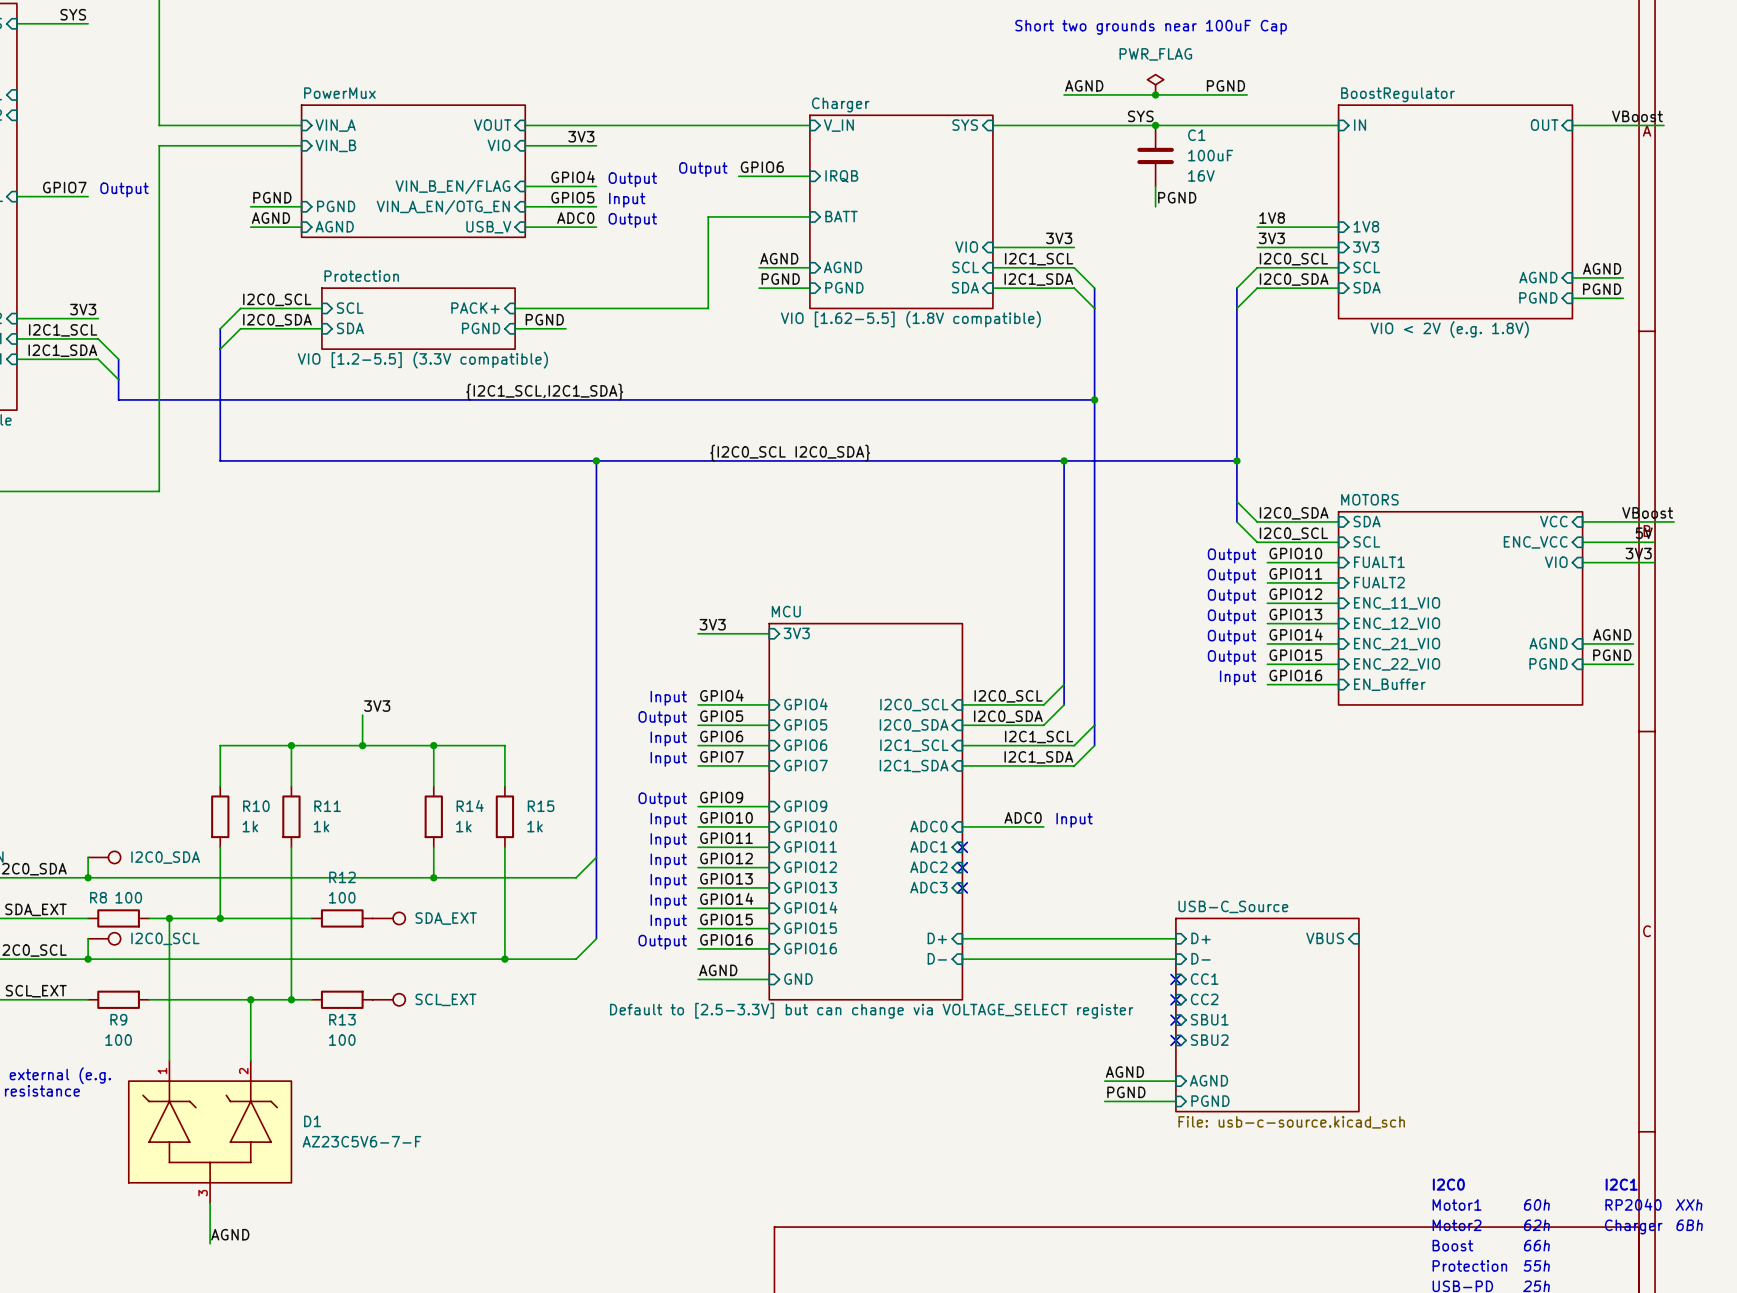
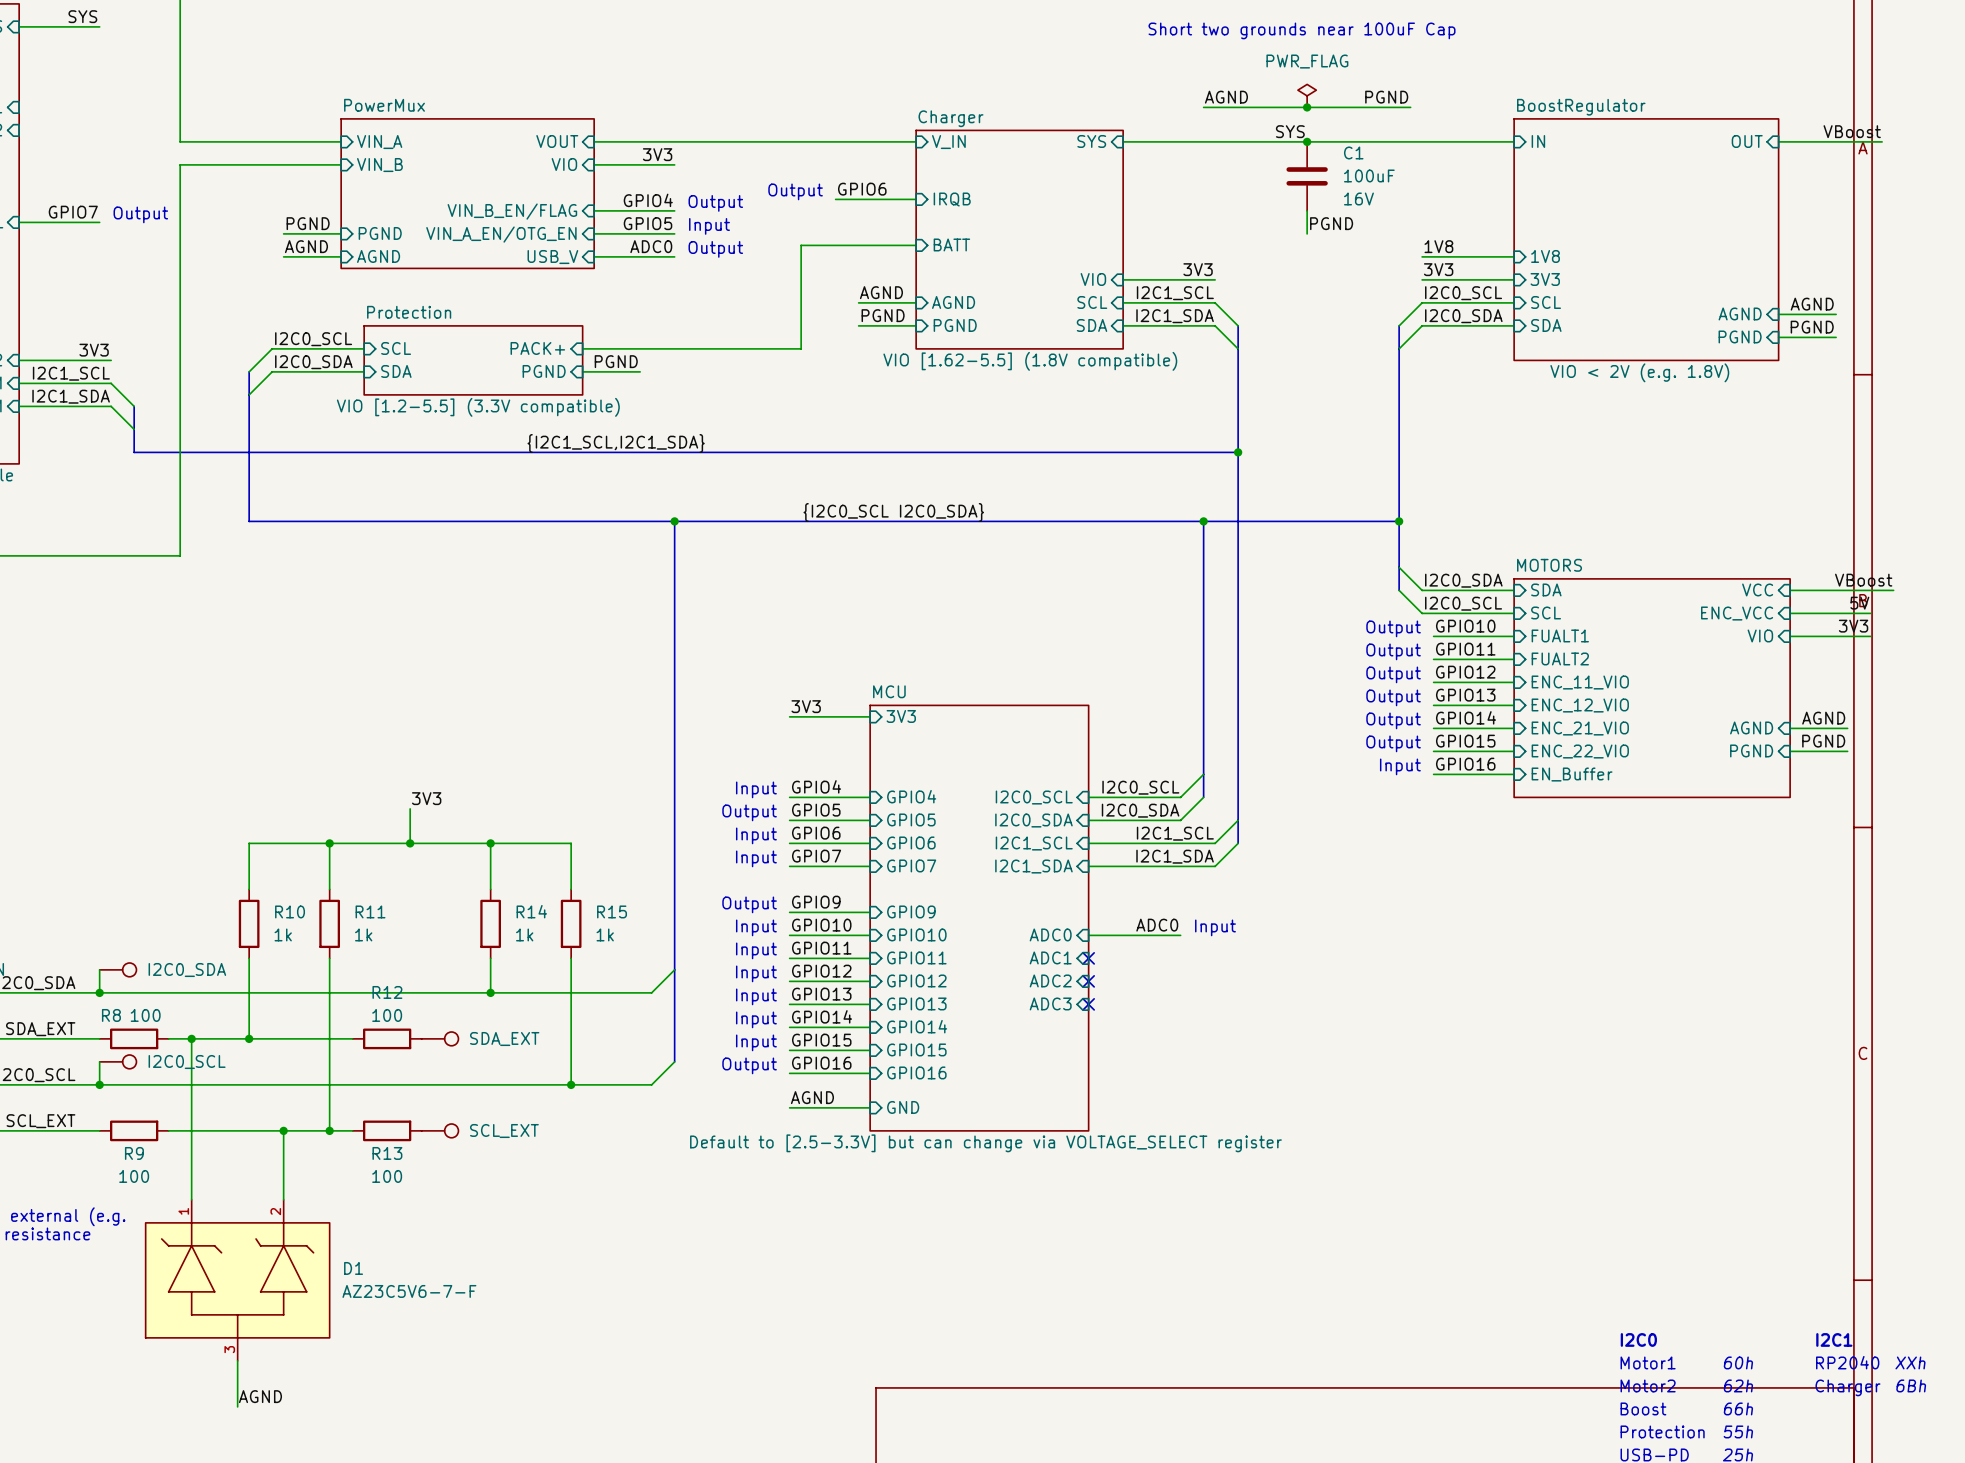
sheet pin: D+ (937, 938) -> none
wire: (962, 938) (1175, 938) -> none
sheet pin: D+ (1201, 938) -> none
sheet pin: VBUS (1325, 938) -> none
sheet pin: D- (937, 958) -> none
sheet pin: D- (1201, 958) -> none
wire: (962, 959) (1175, 959) -> none
no-connect mark: (1175, 979) -> none
sheet pin: CC1 (1204, 979) -> none
no-connect mark: (1175, 999) -> none
sheet pin: CC2 (1204, 999) -> none
sheet USB-C_Source: File: usb-c-source.kicad_sch (1267, 1015) -> none
sheet pin: SBU1 (1209, 1019) -> none
no-connect mark: (1175, 1020) -> none
no-connect mark: (1175, 1040) -> none
sheet pin: SBU2 (1209, 1040) -> none
label: AGND (1124, 1072) -> none
sheet pin: AGND (1209, 1080) -> none
wire: (1104, 1081) (1175, 1081) -> none
label: PGND (1126, 1092) -> none
wire: (1104, 1101) (1175, 1101) -> none
sheet pin: PGND (1210, 1101) -> none

